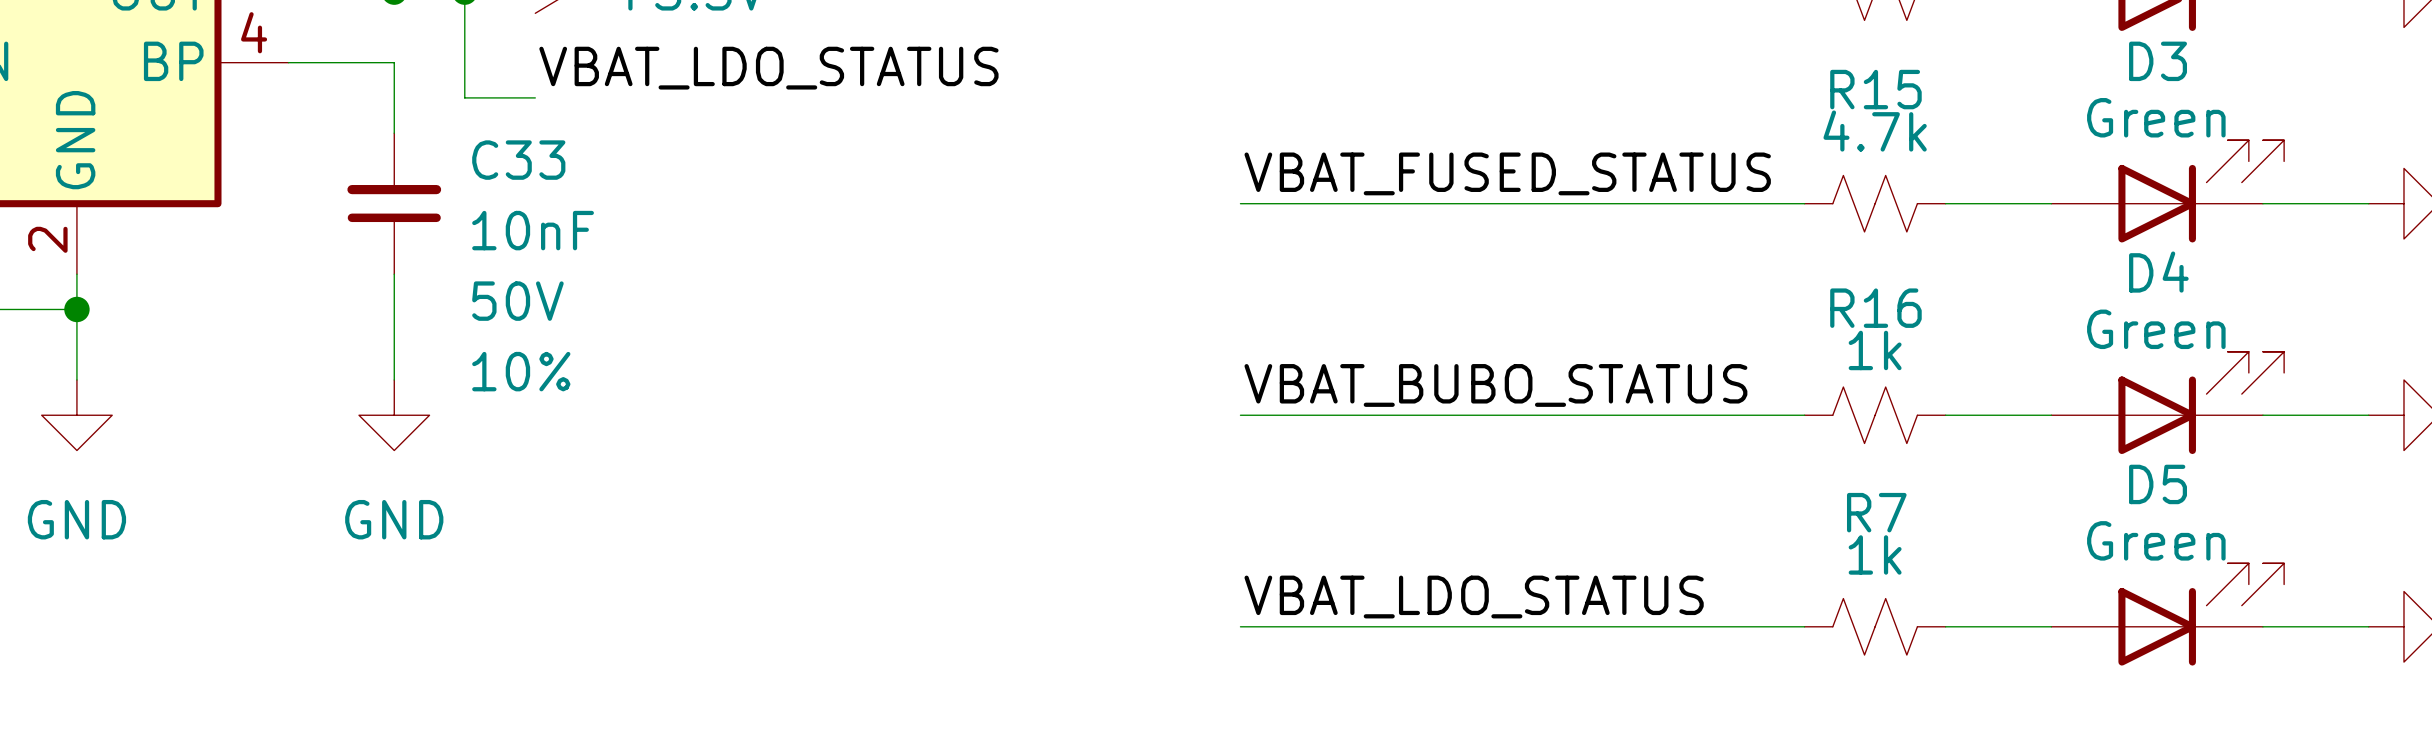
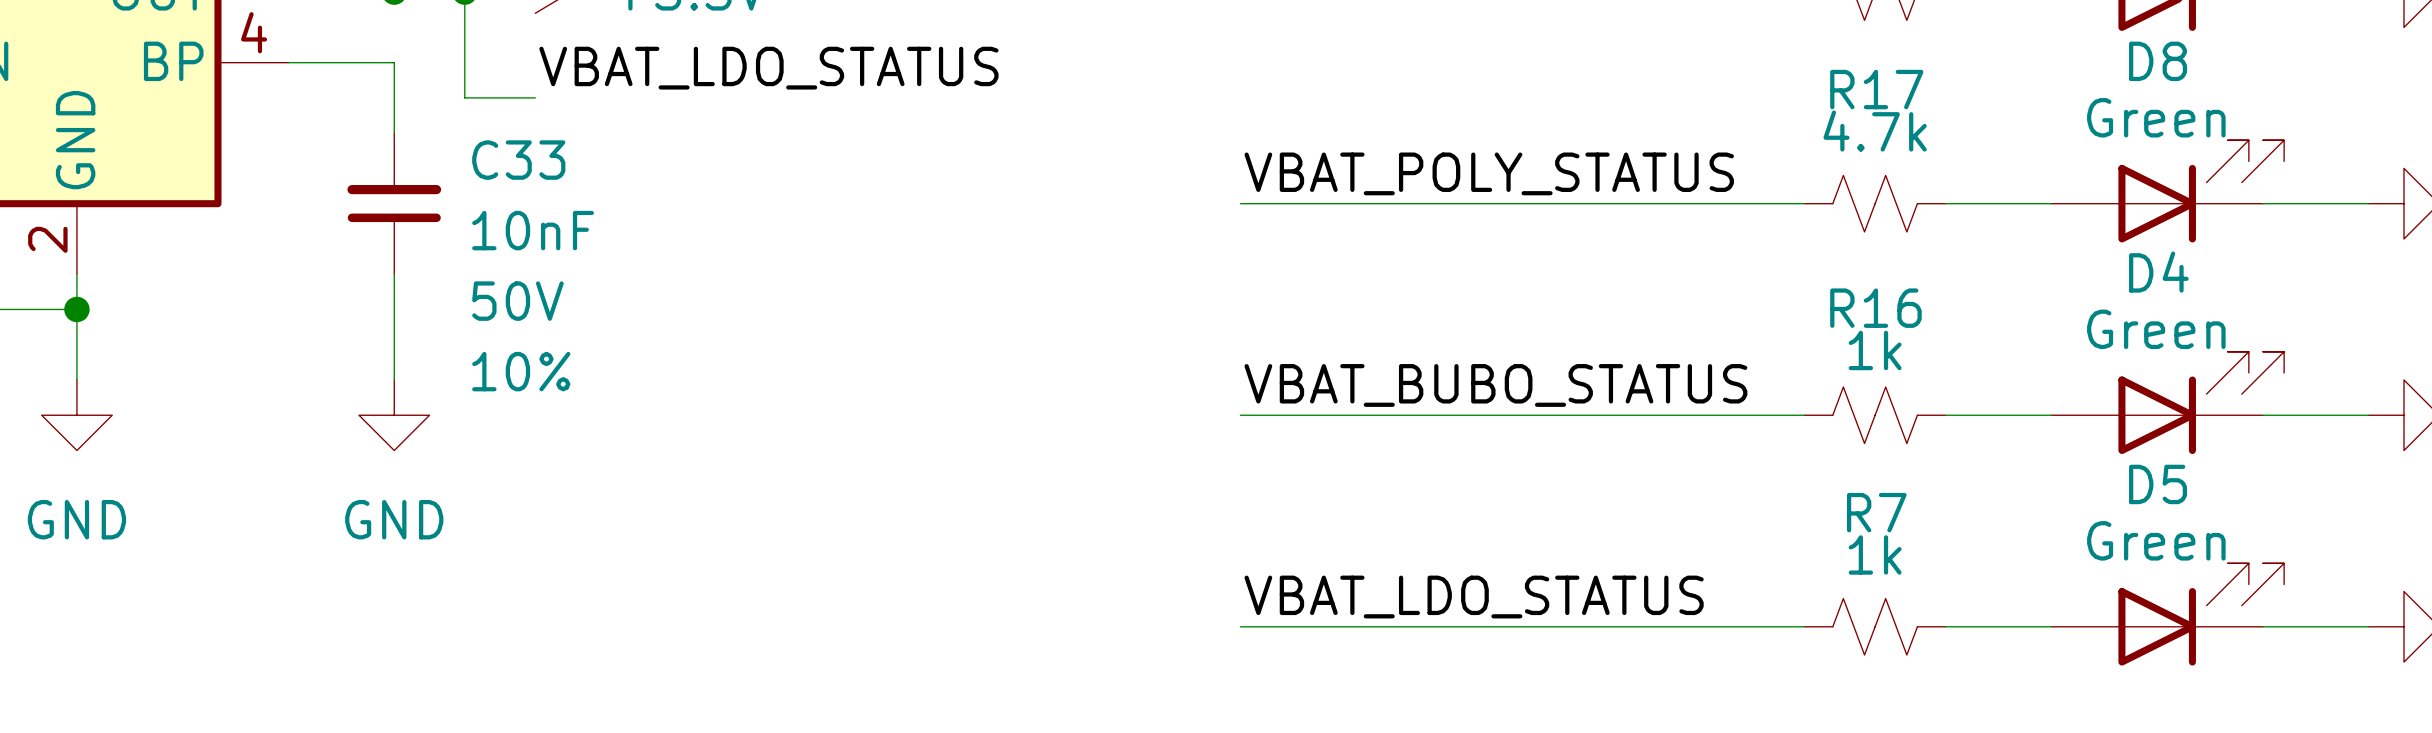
D3 name: D3 (2158, 61) -> D8 (2158, 61)
R15 name: R15 (1875, 89) -> R17 (1876, 89)
label: VBAT_FUSED_STATUS (1507, 173) -> VBAT_POLY_STATUS (1489, 173)

